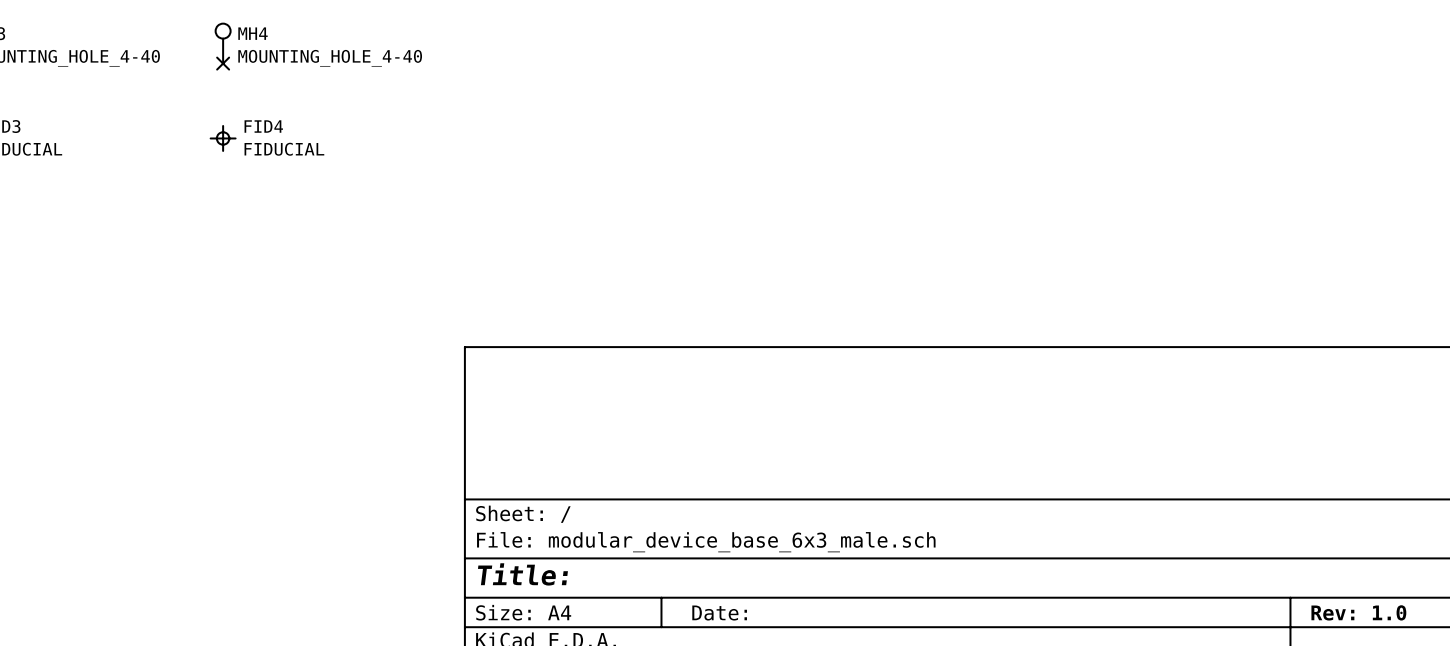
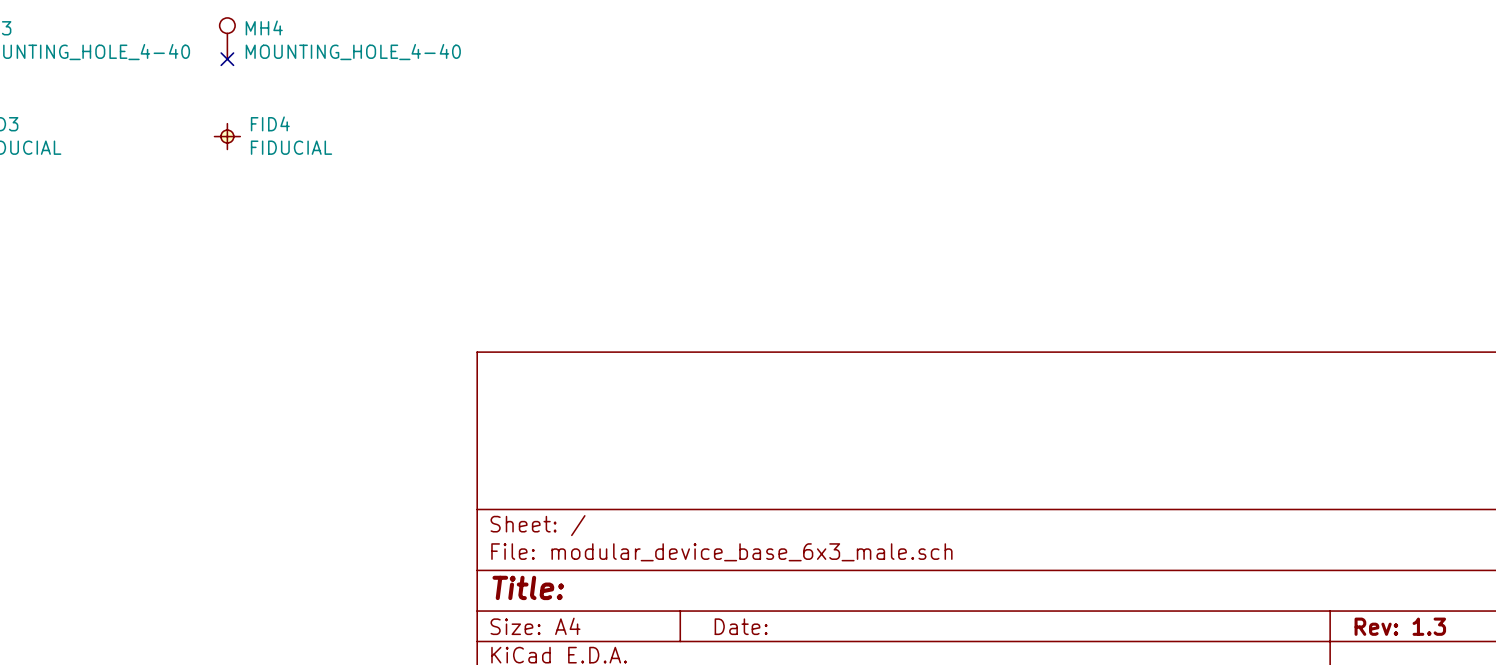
title block: Rev: 1.0 (1358, 612) -> Rev: 1.3 (1400, 626)

